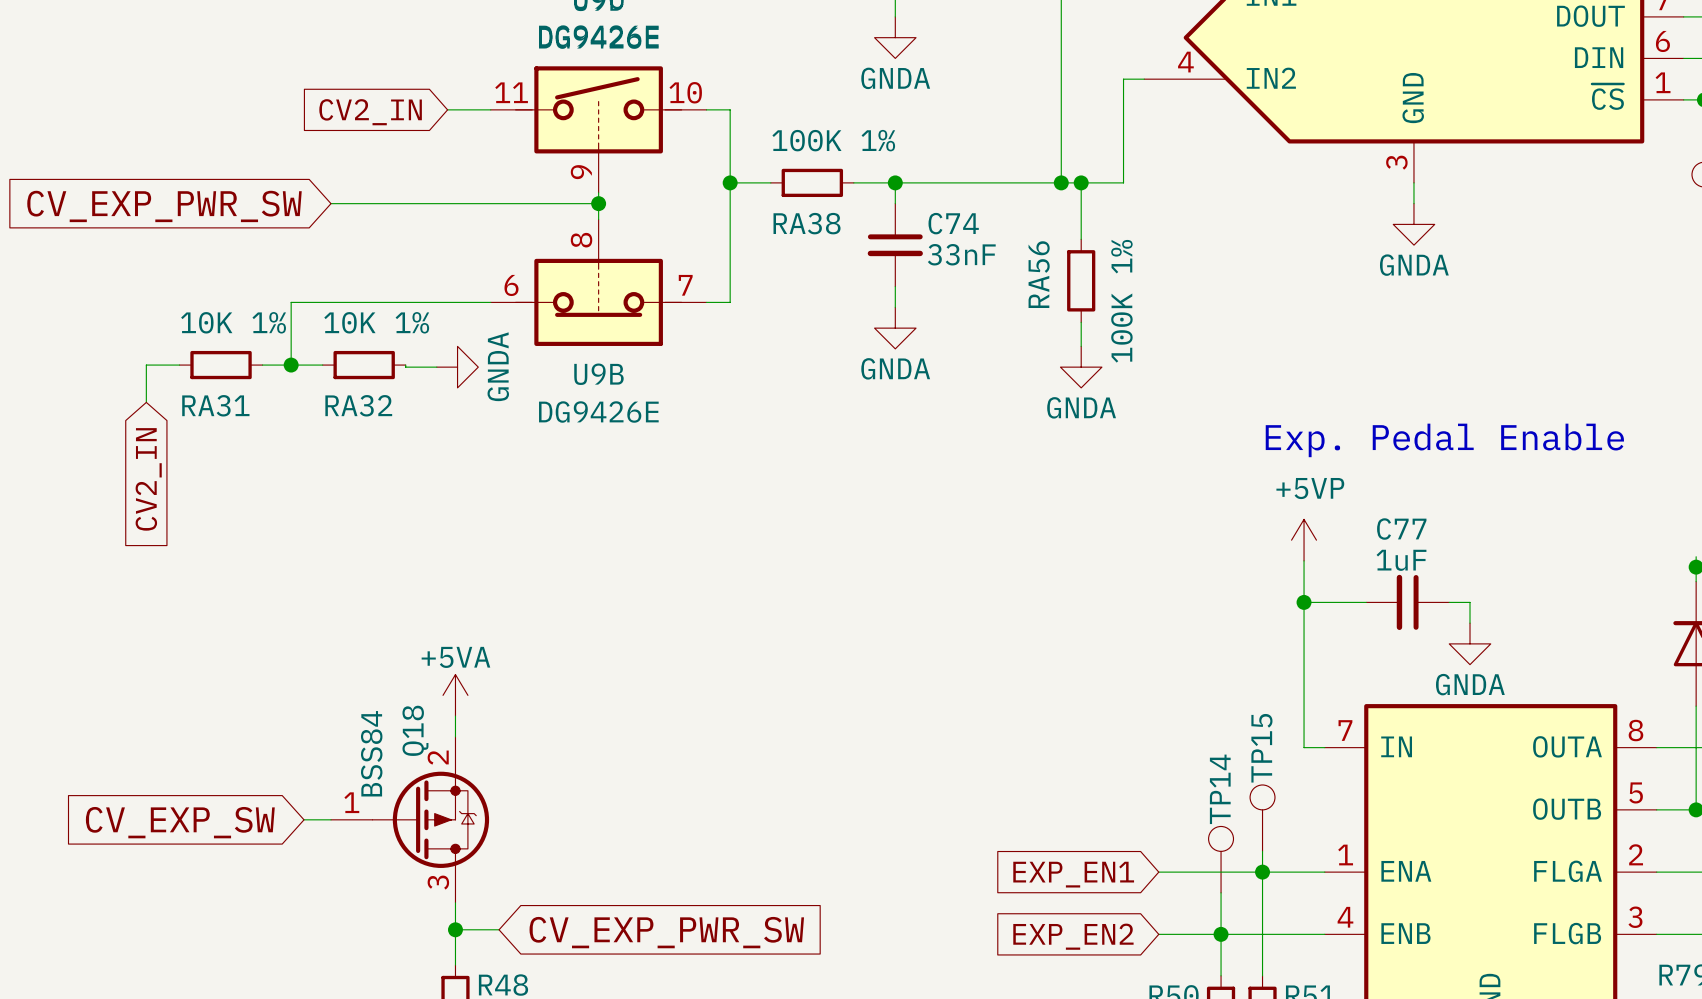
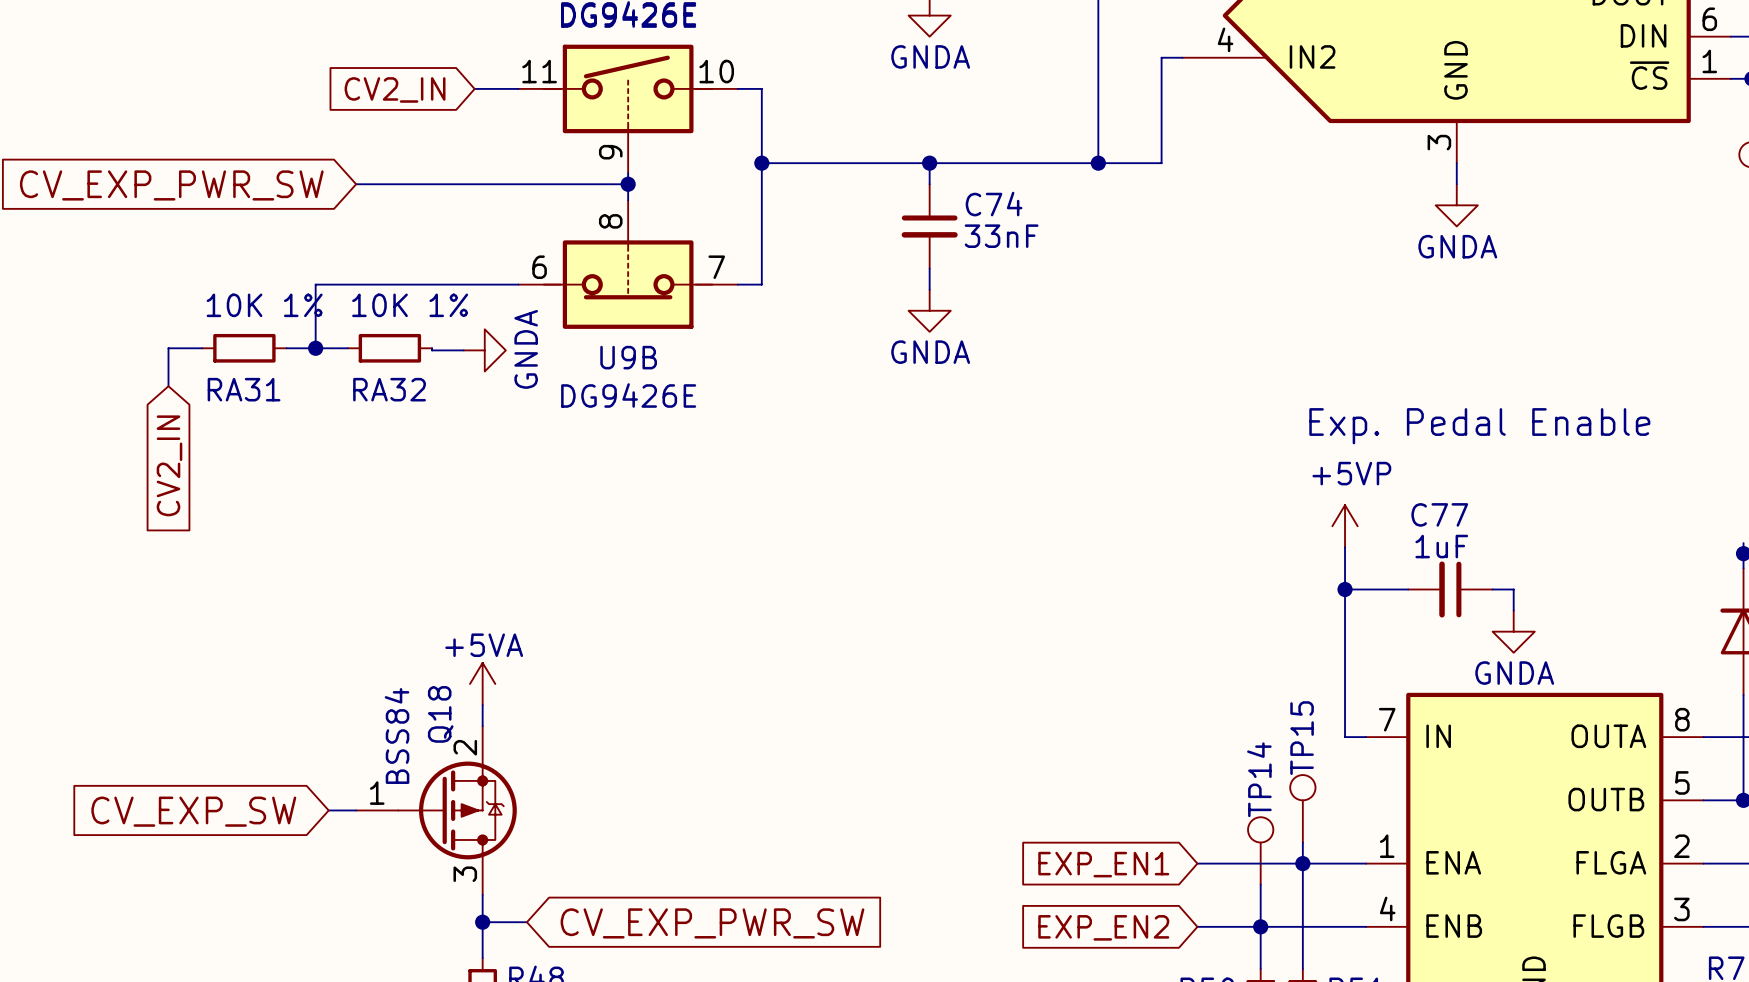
wire: none -> (803, 163) (887, 163)
RA38: 100K 1% (812, 182) -> none
wire: (1081, 182) (1081, 239) -> none
junction: (1081, 182) -> none
RA56: 100K 1% (1081, 280) -> none
wire: (1081, 322) (1081, 346) -> none
power symbol: GNDA (1081, 367) -> none

